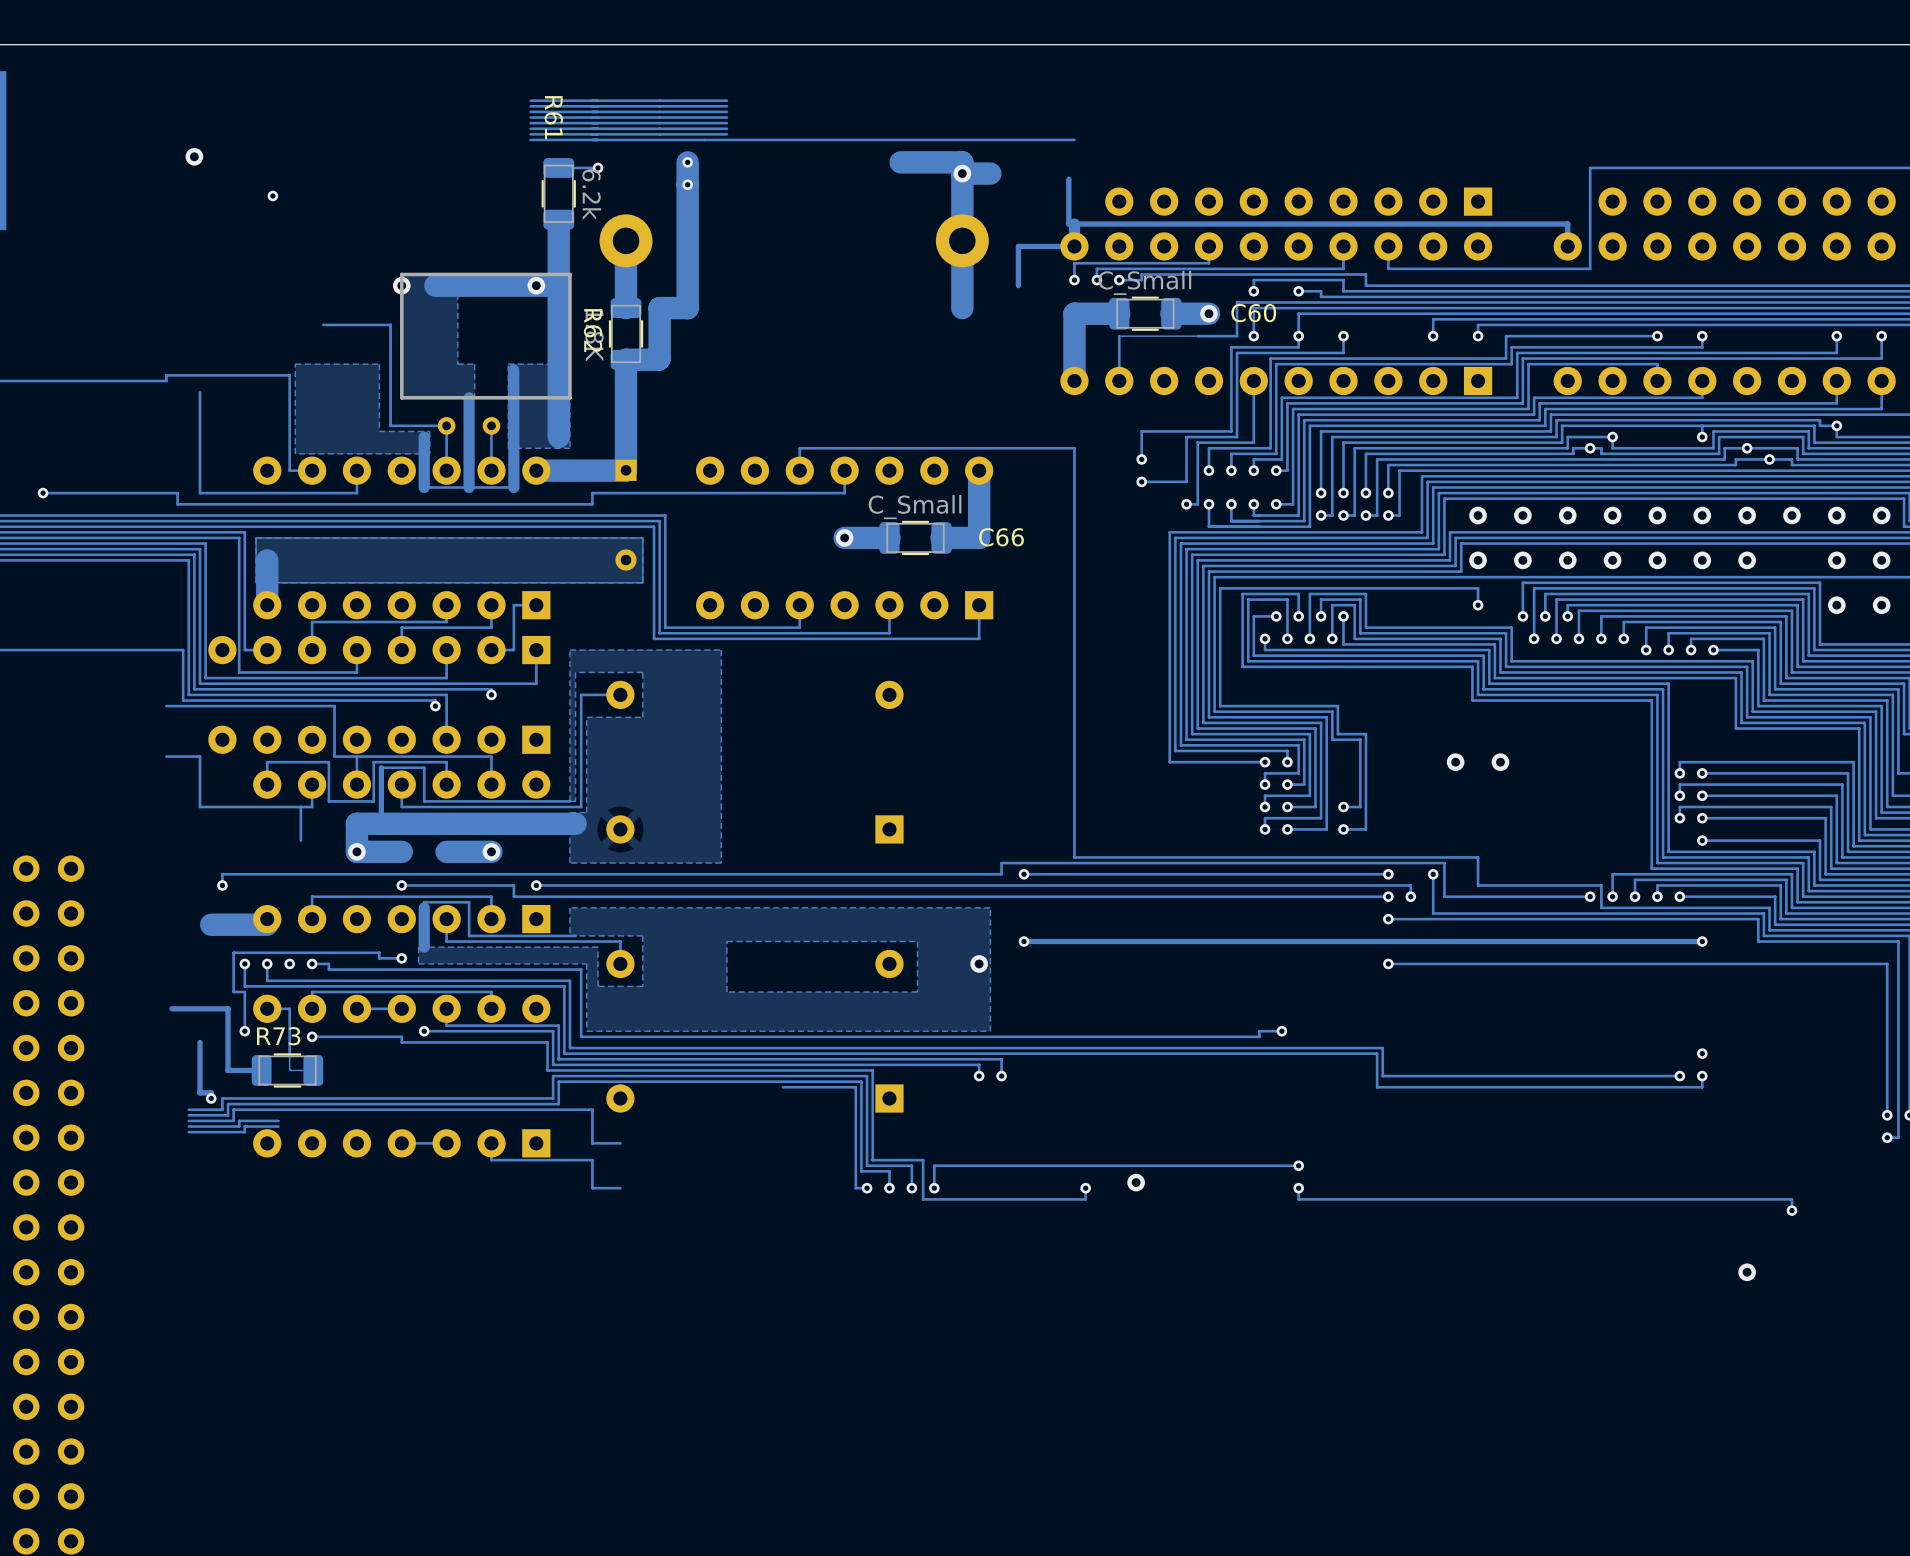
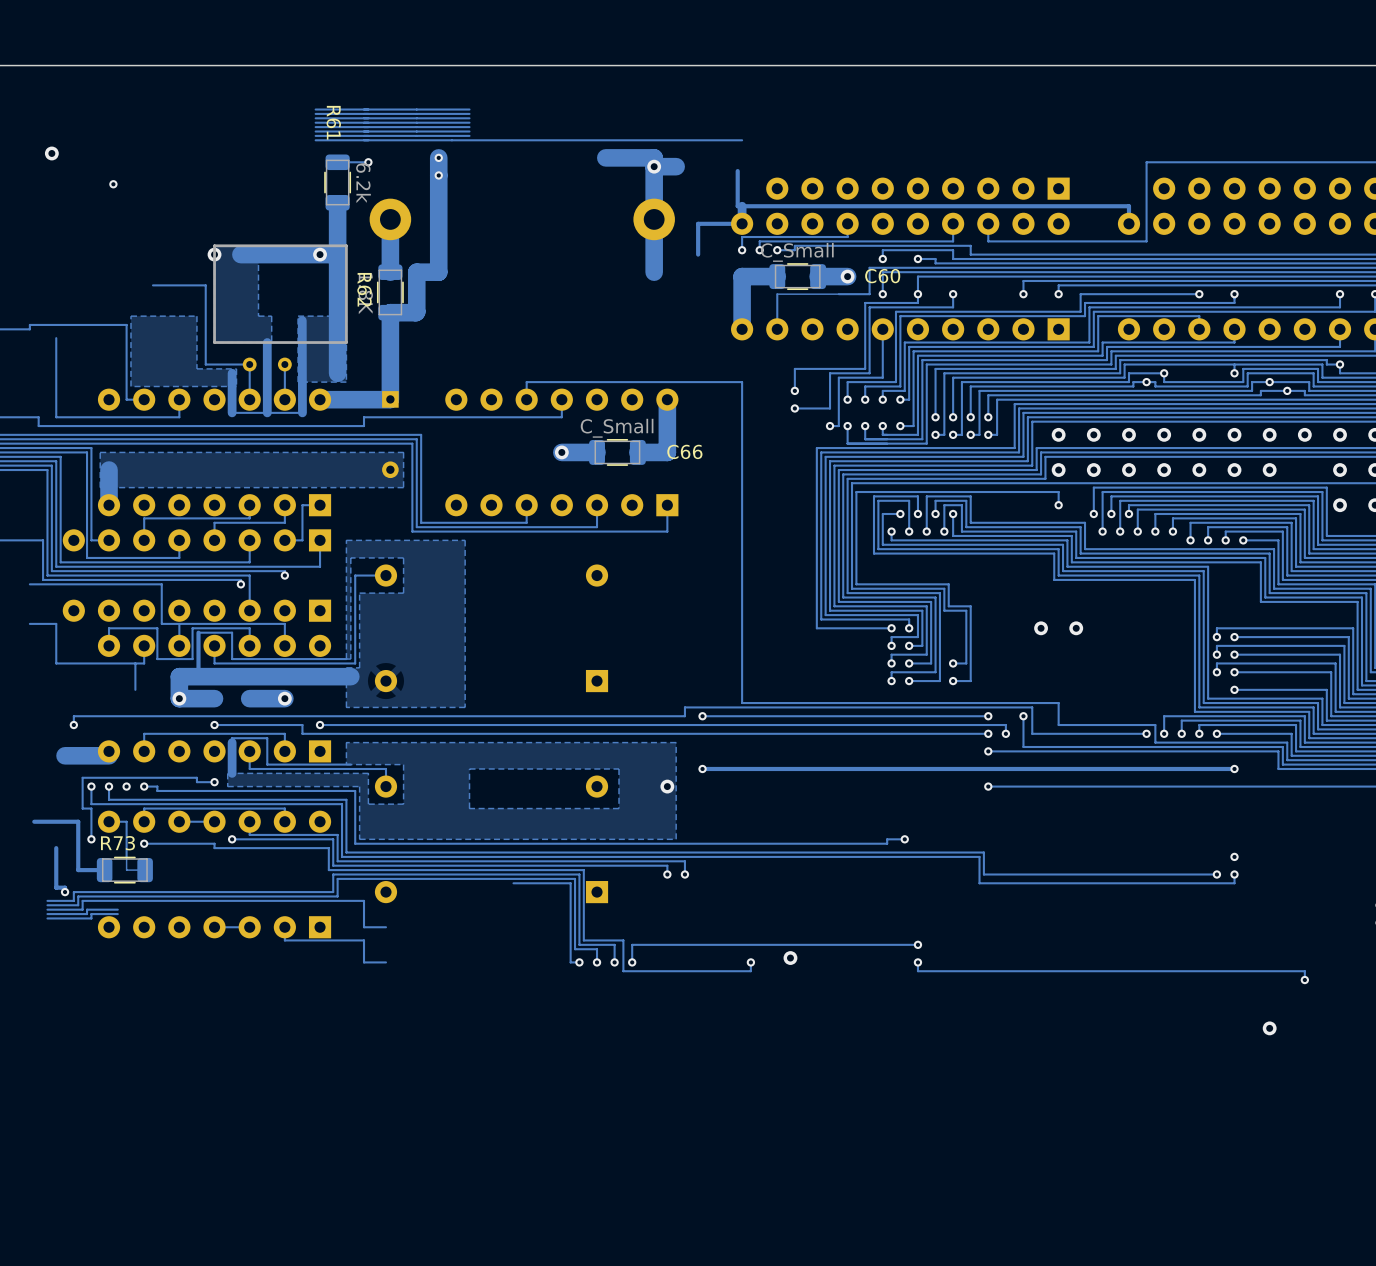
track: (642, 537) (256, 537) (256, 582) (642, 582) (642, 537) -> none

